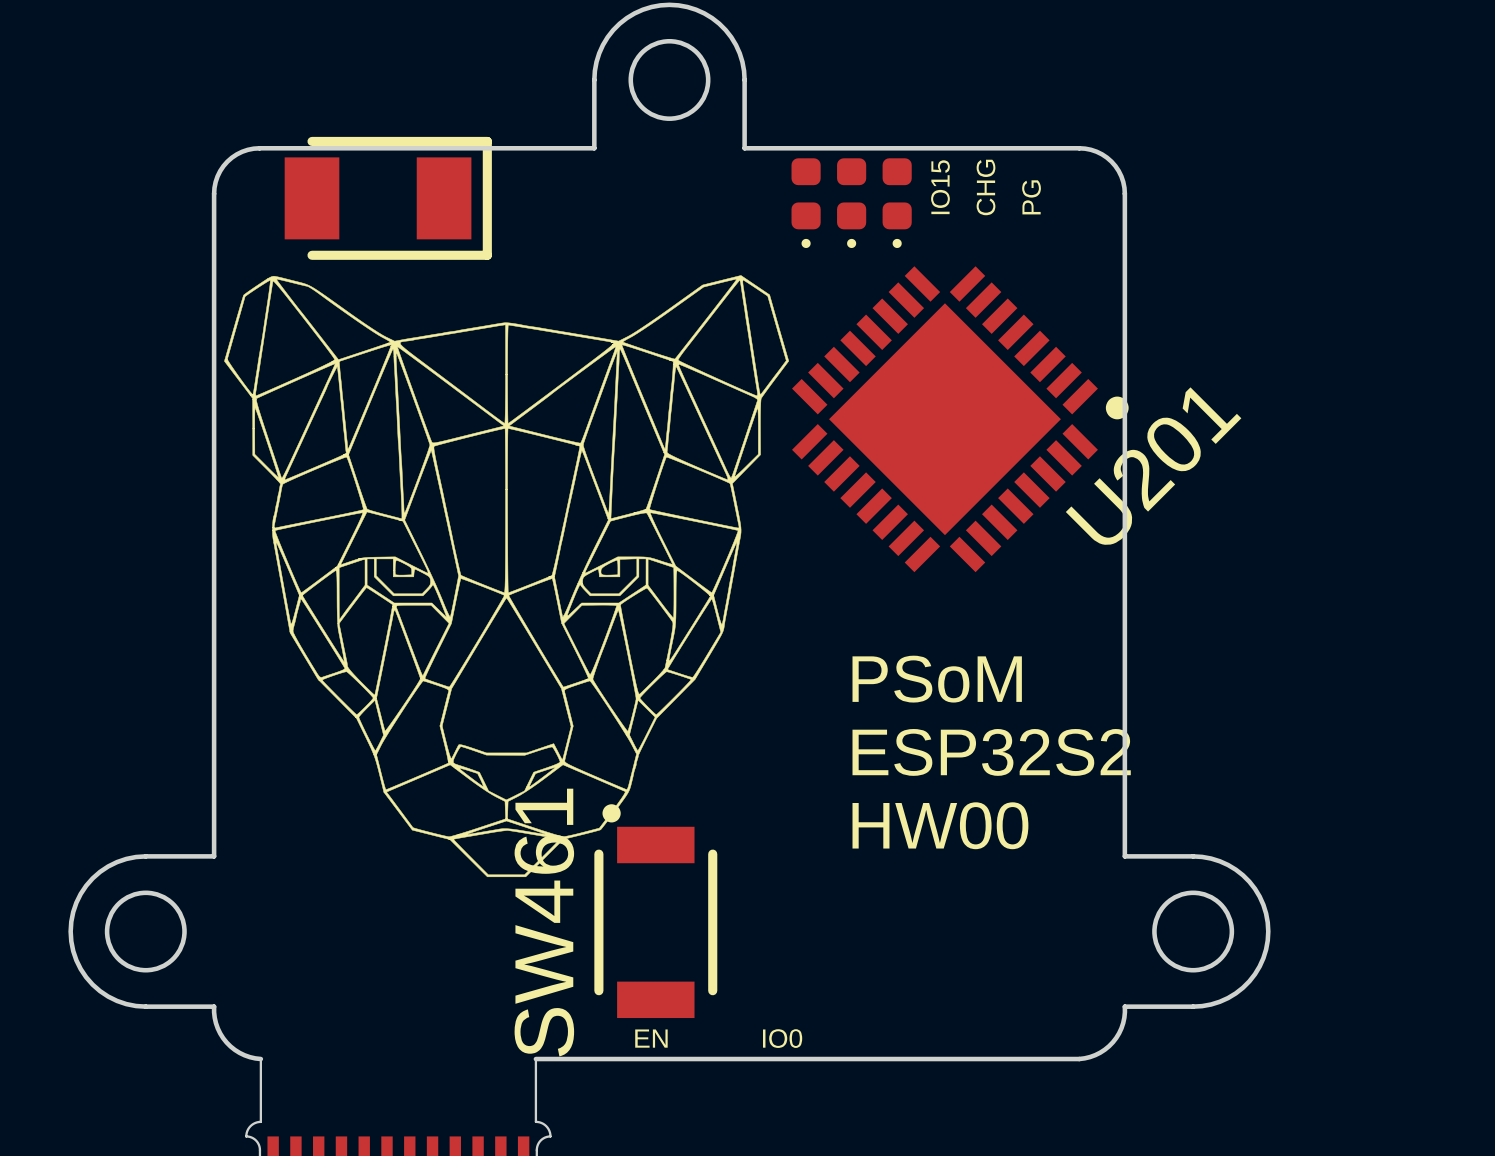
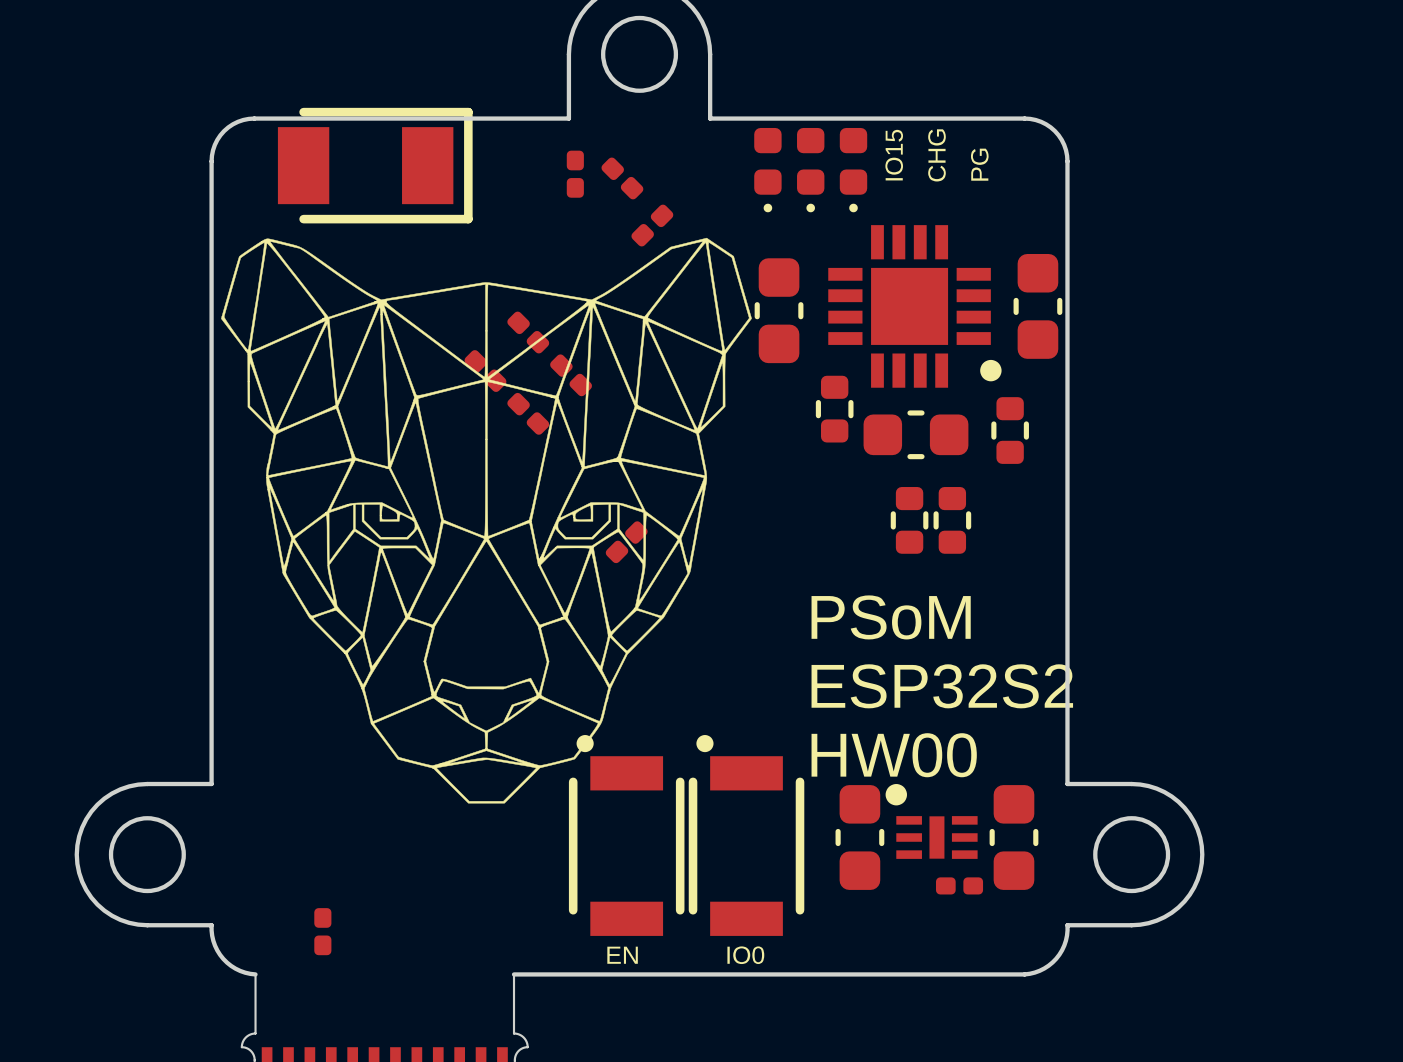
part: none -> (575, 174)
part: none -> (622, 178)
part: none -> (652, 225)
part: none -> (914, 306)
part: none -> (1037, 306)
part: none -> (779, 310)
part: none -> (528, 332)
part: none -> (485, 371)
U201: (960, 419) -> none
part: none -> (571, 375)
part: none -> (834, 409)
part: none -> (528, 413)
part: none -> (1010, 430)
part: none -> (915, 434)
part: none -> (909, 520)
part: none -> (952, 520)
part: none -> (626, 542)
part: none -> (931, 821)
part: none -> (746, 835)
part: none -> (859, 837)
part: none -> (1013, 837)
SW461 name: SW461 (544, 922) -> none
part: none -> (959, 885)
part: none -> (322, 931)

